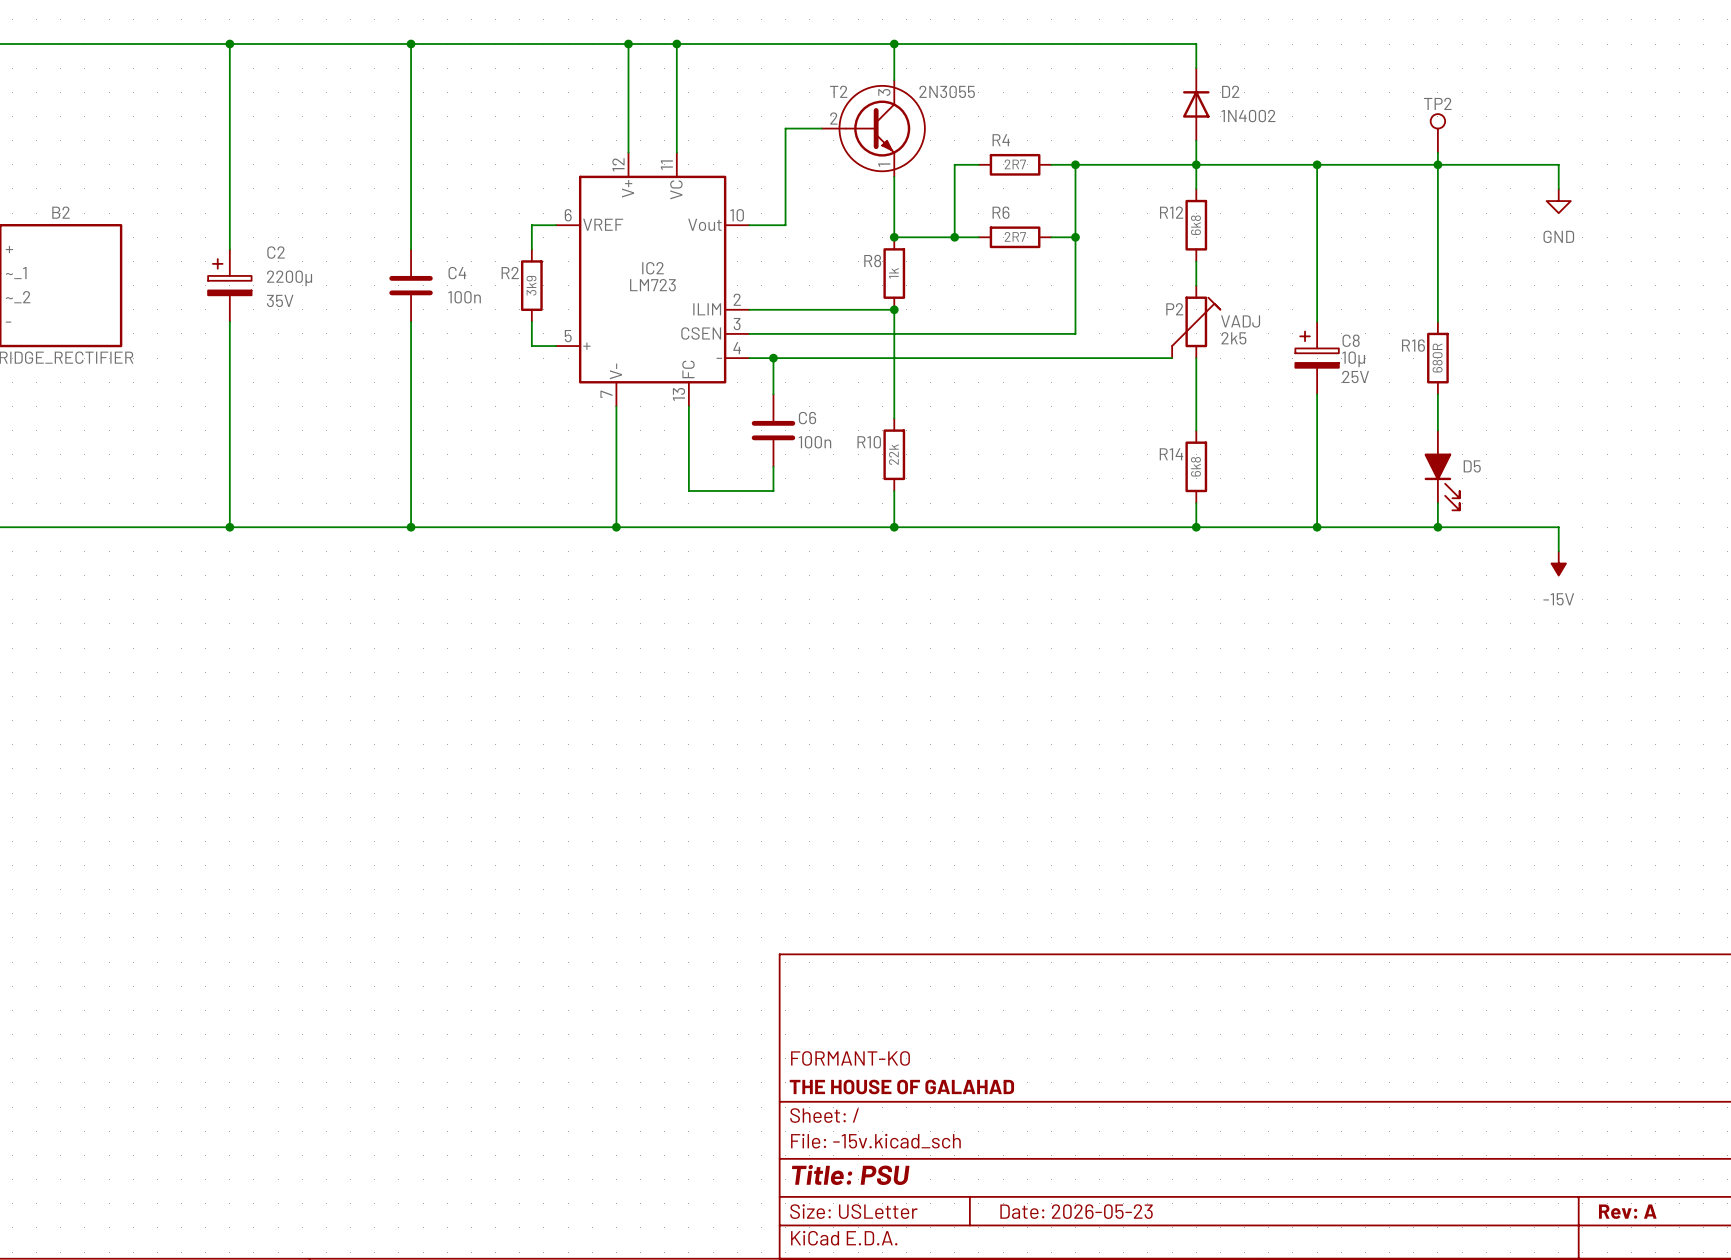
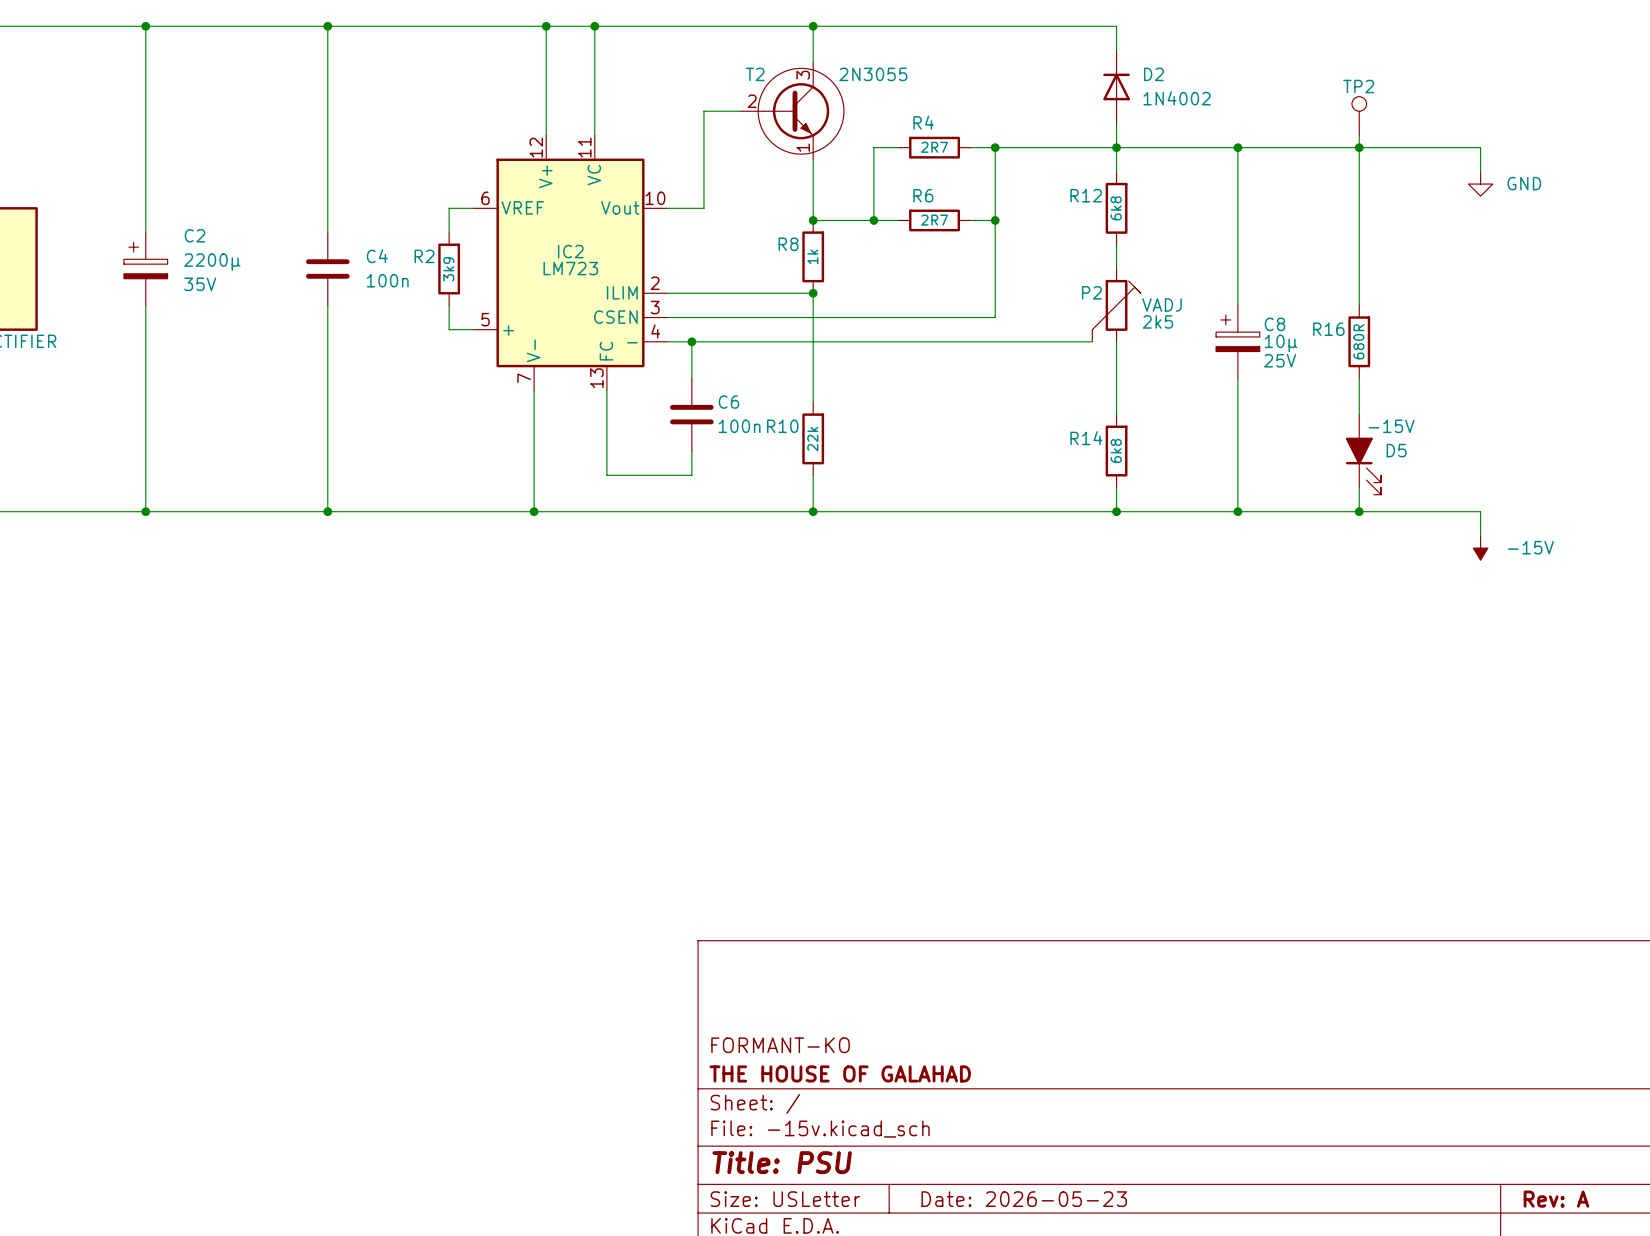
power symbol text position: GND (1558, 236) -> GND (1524, 183)
D5 text: none -> -15V (1391, 426)
power symbol text position: -15V (1558, 599) -> -15V (1530, 547)

